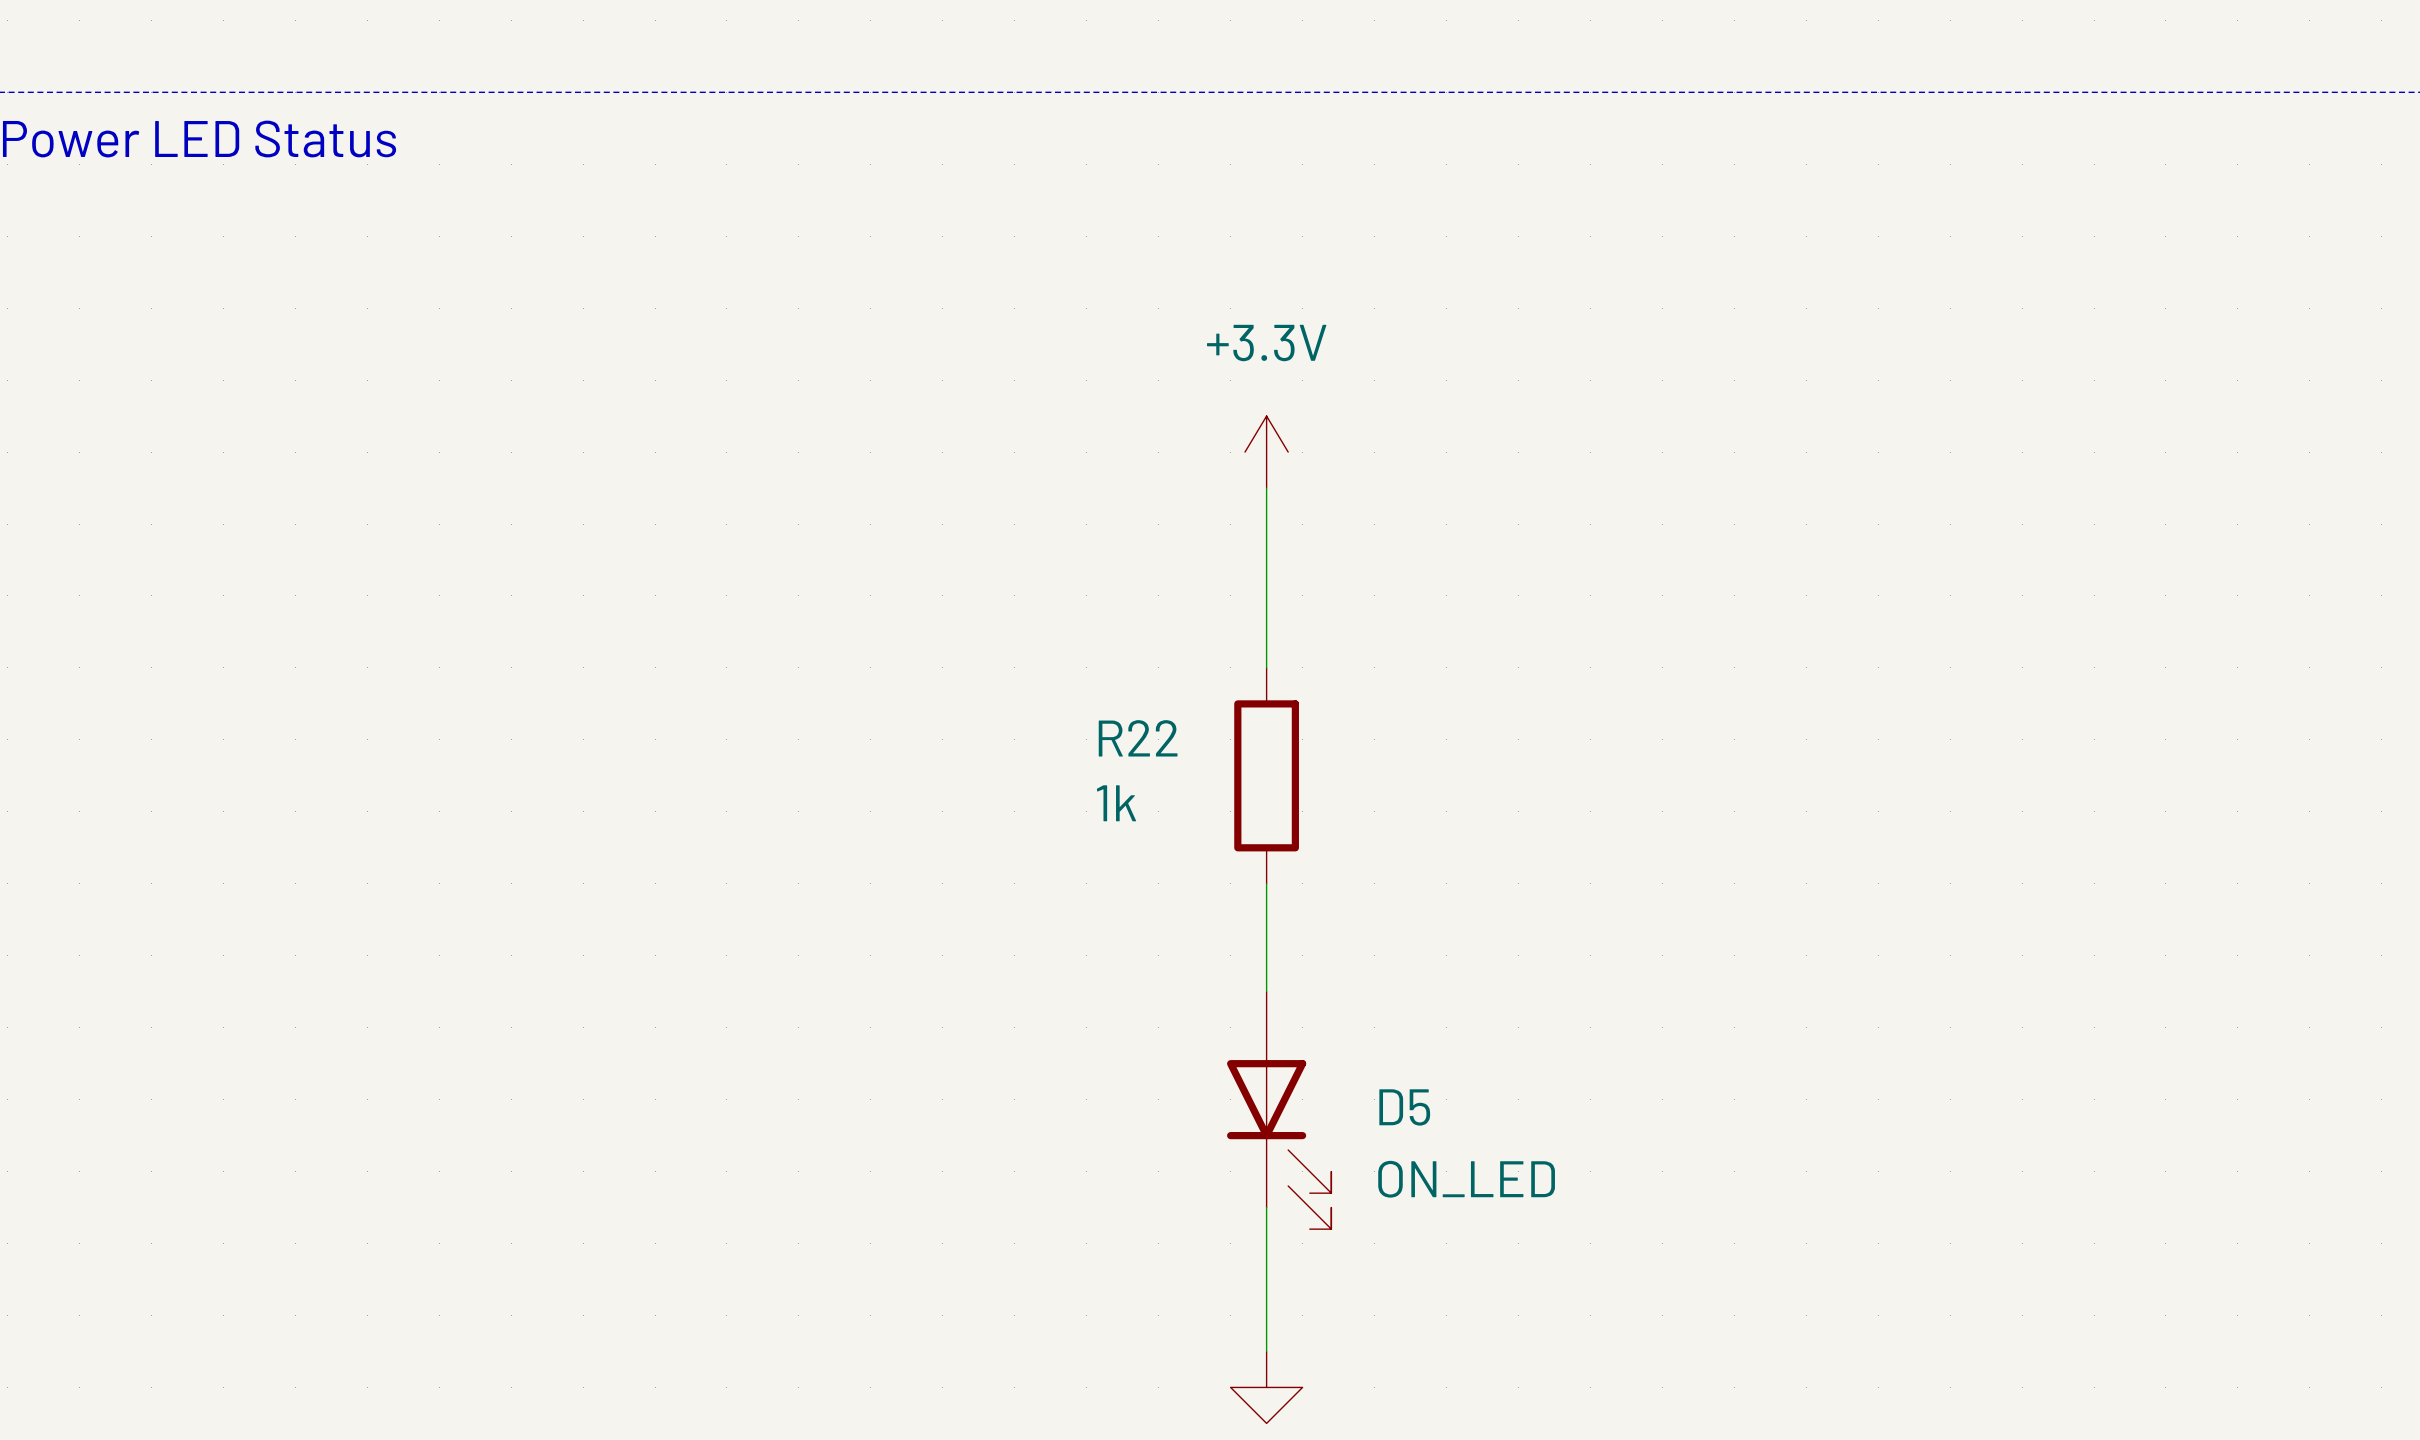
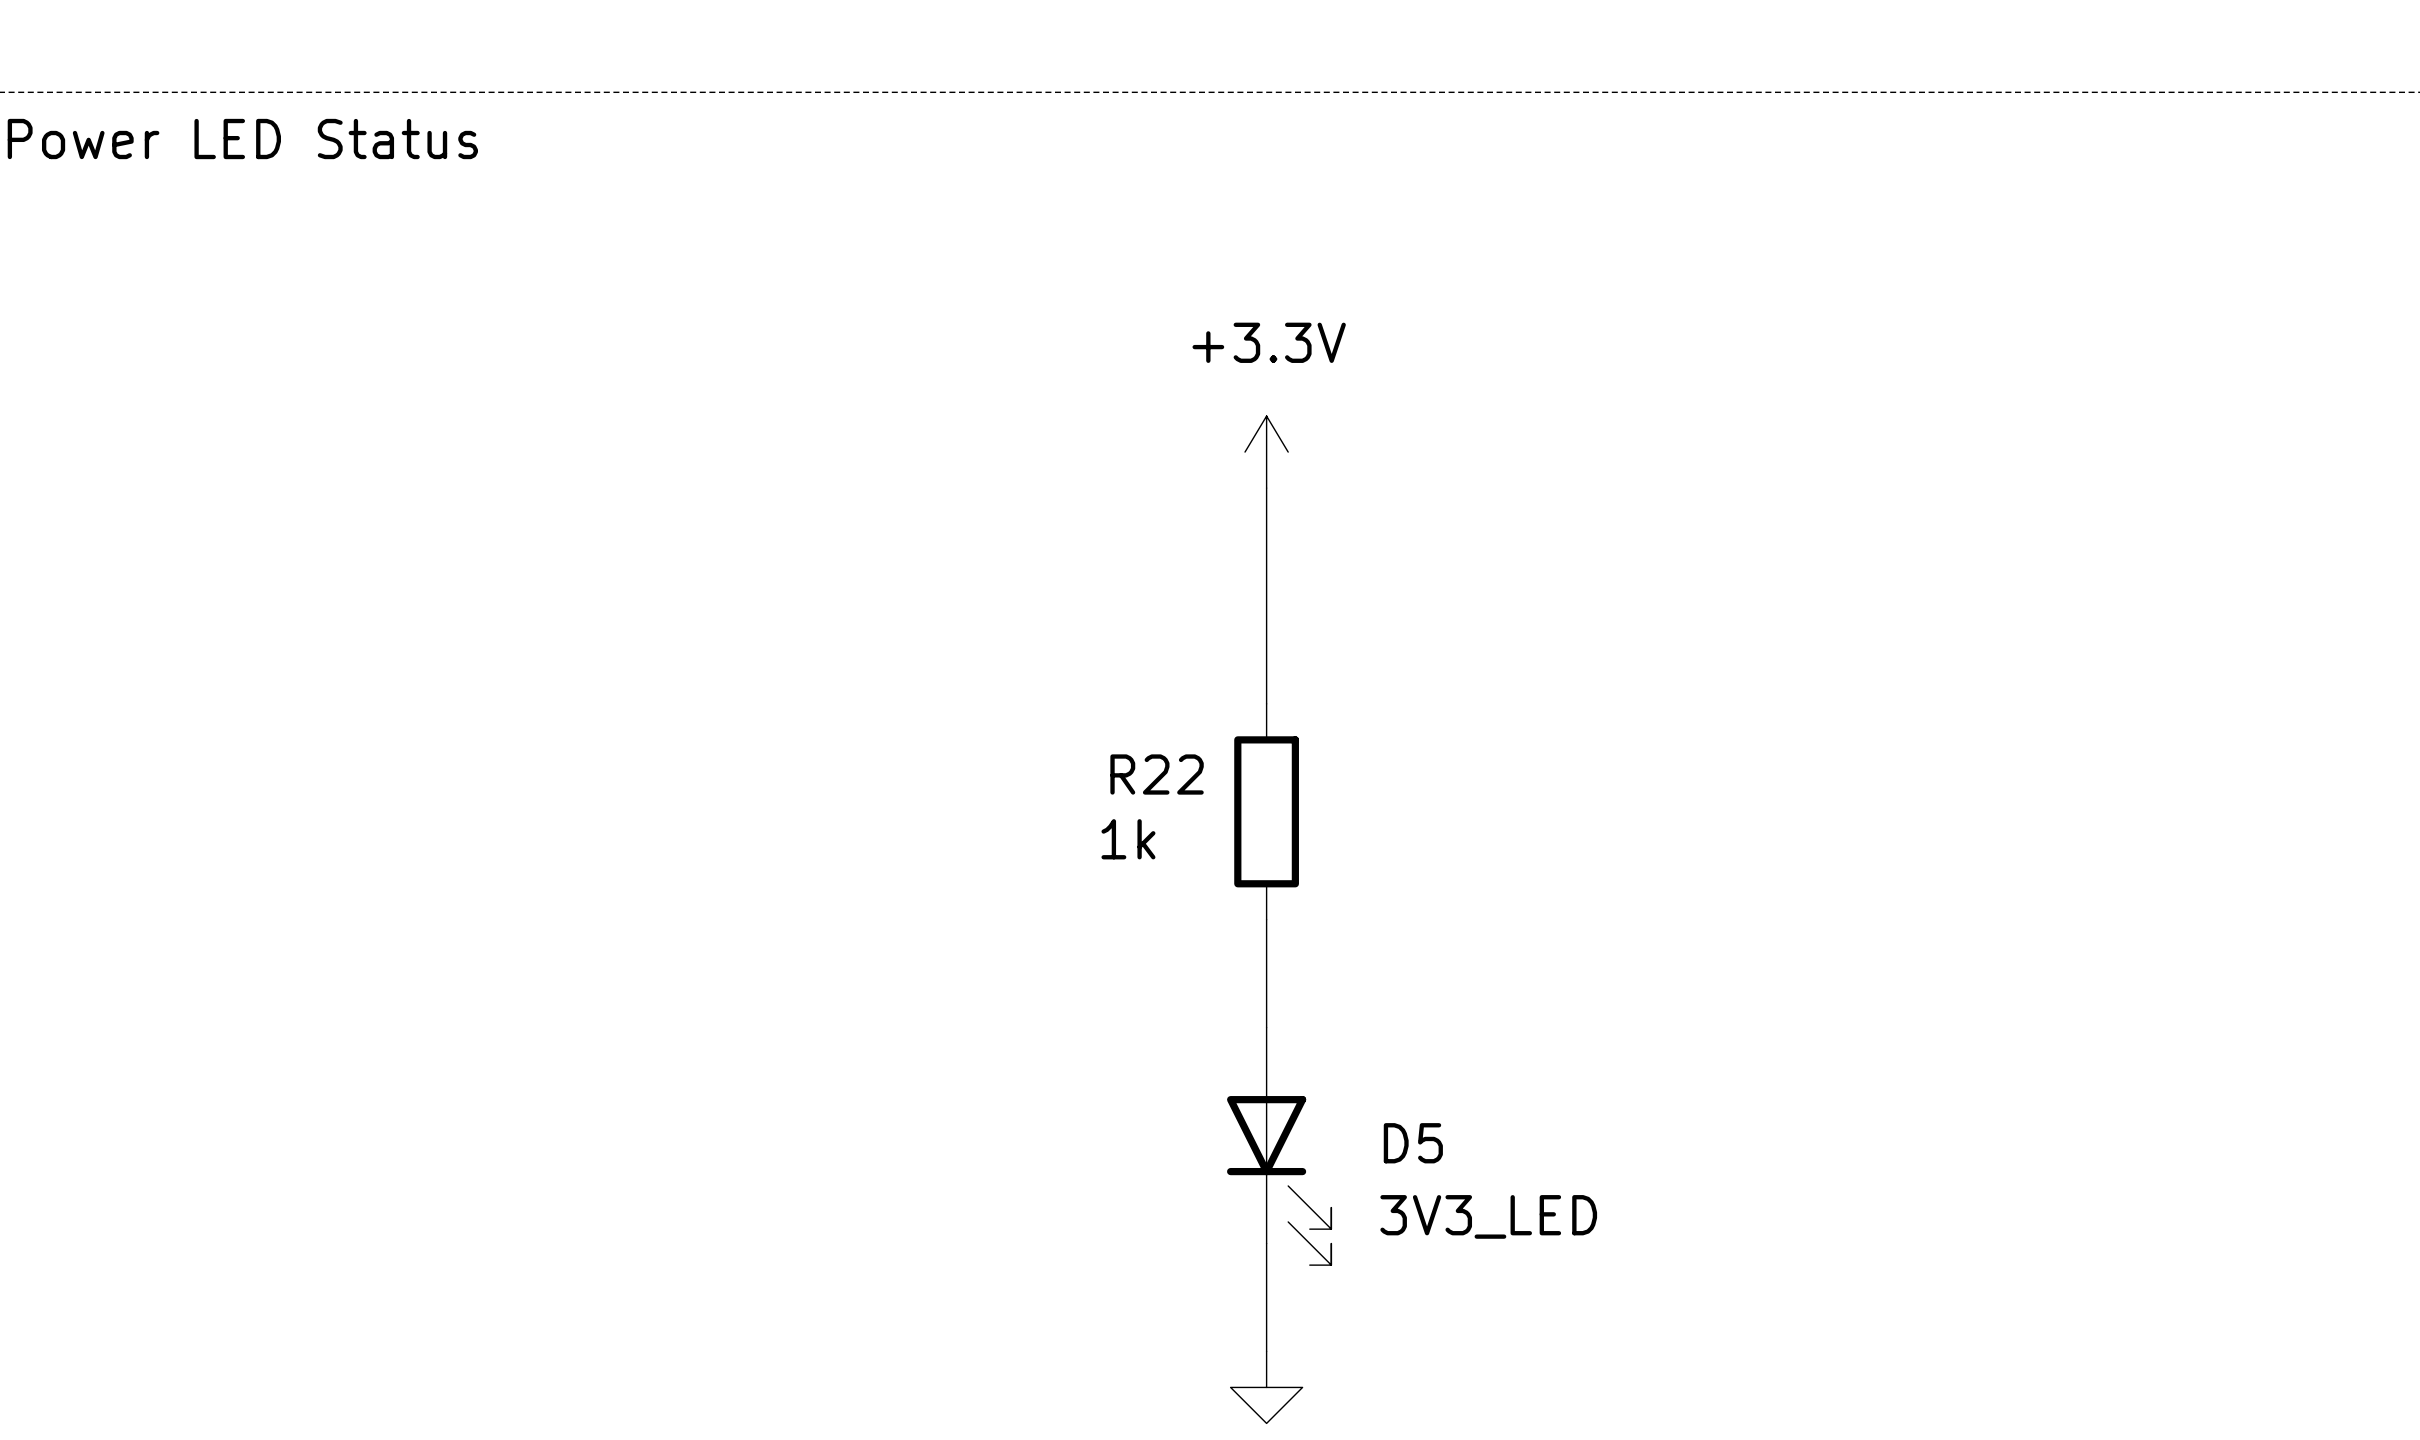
R22 name position: R22 (1138, 738) -> R22 (1157, 774)
R22 position: (1266, 775) -> (1266, 811)
D5 position: (1279, 1110) -> (1279, 1146)
D5 value: ON_LED (1466, 1179) -> 3V3_LED (1488, 1216)

